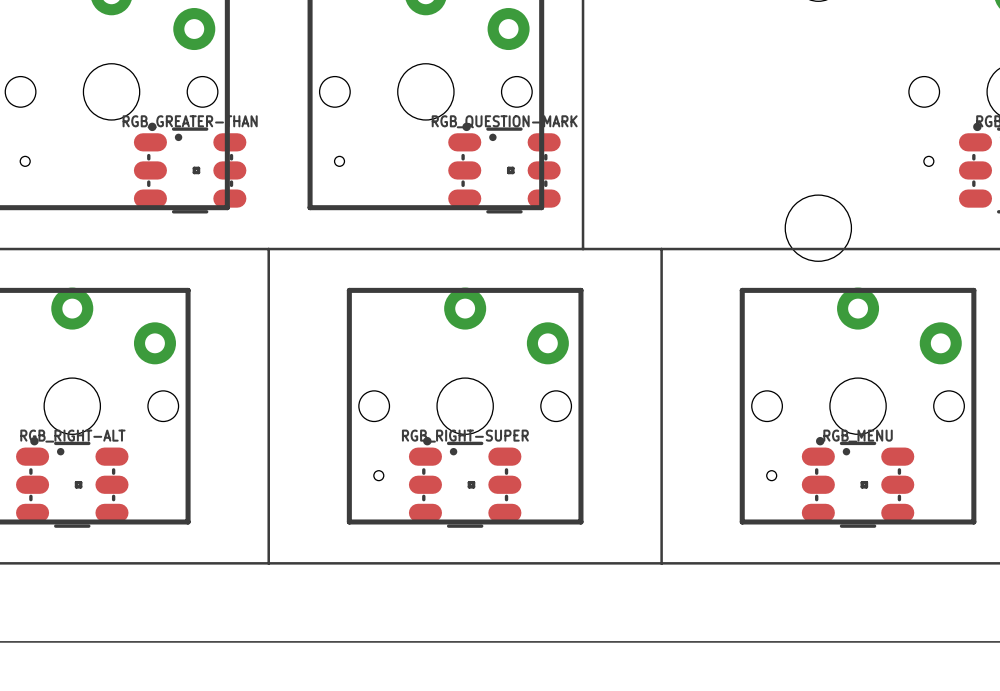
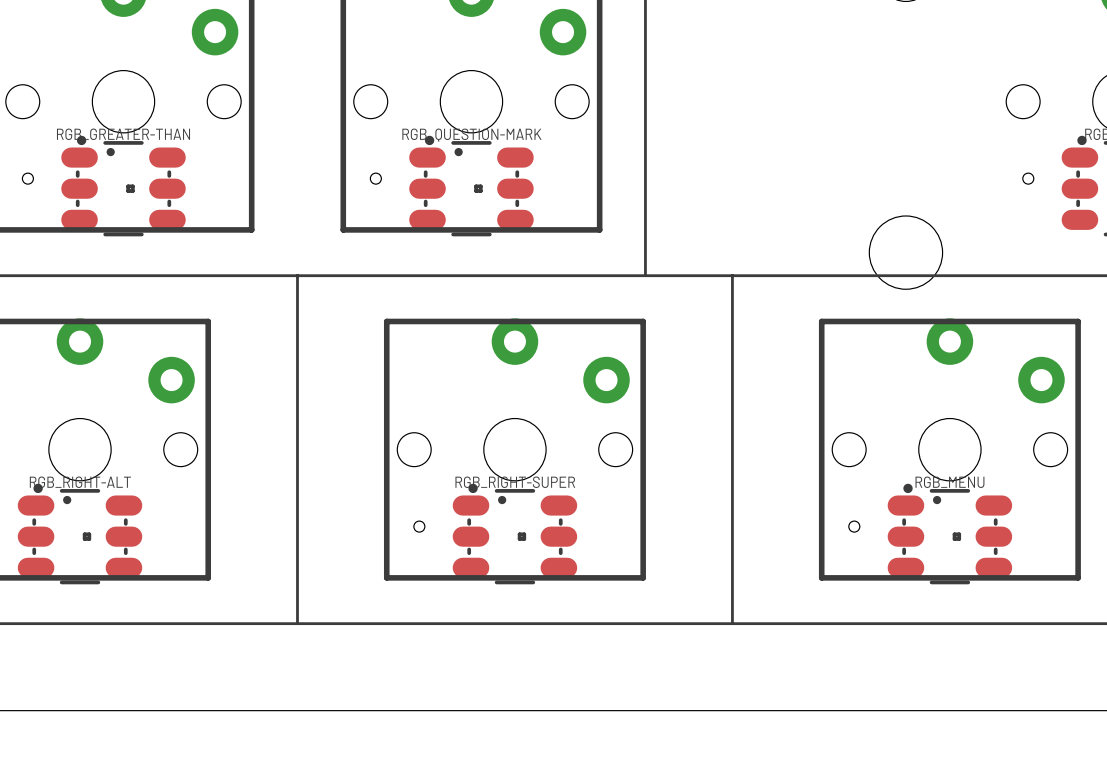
RGB_GREATER-THAN position: (190, 168) -> (123, 186)
RGB_QUESTION-MARK position: (504, 168) -> (471, 186)

